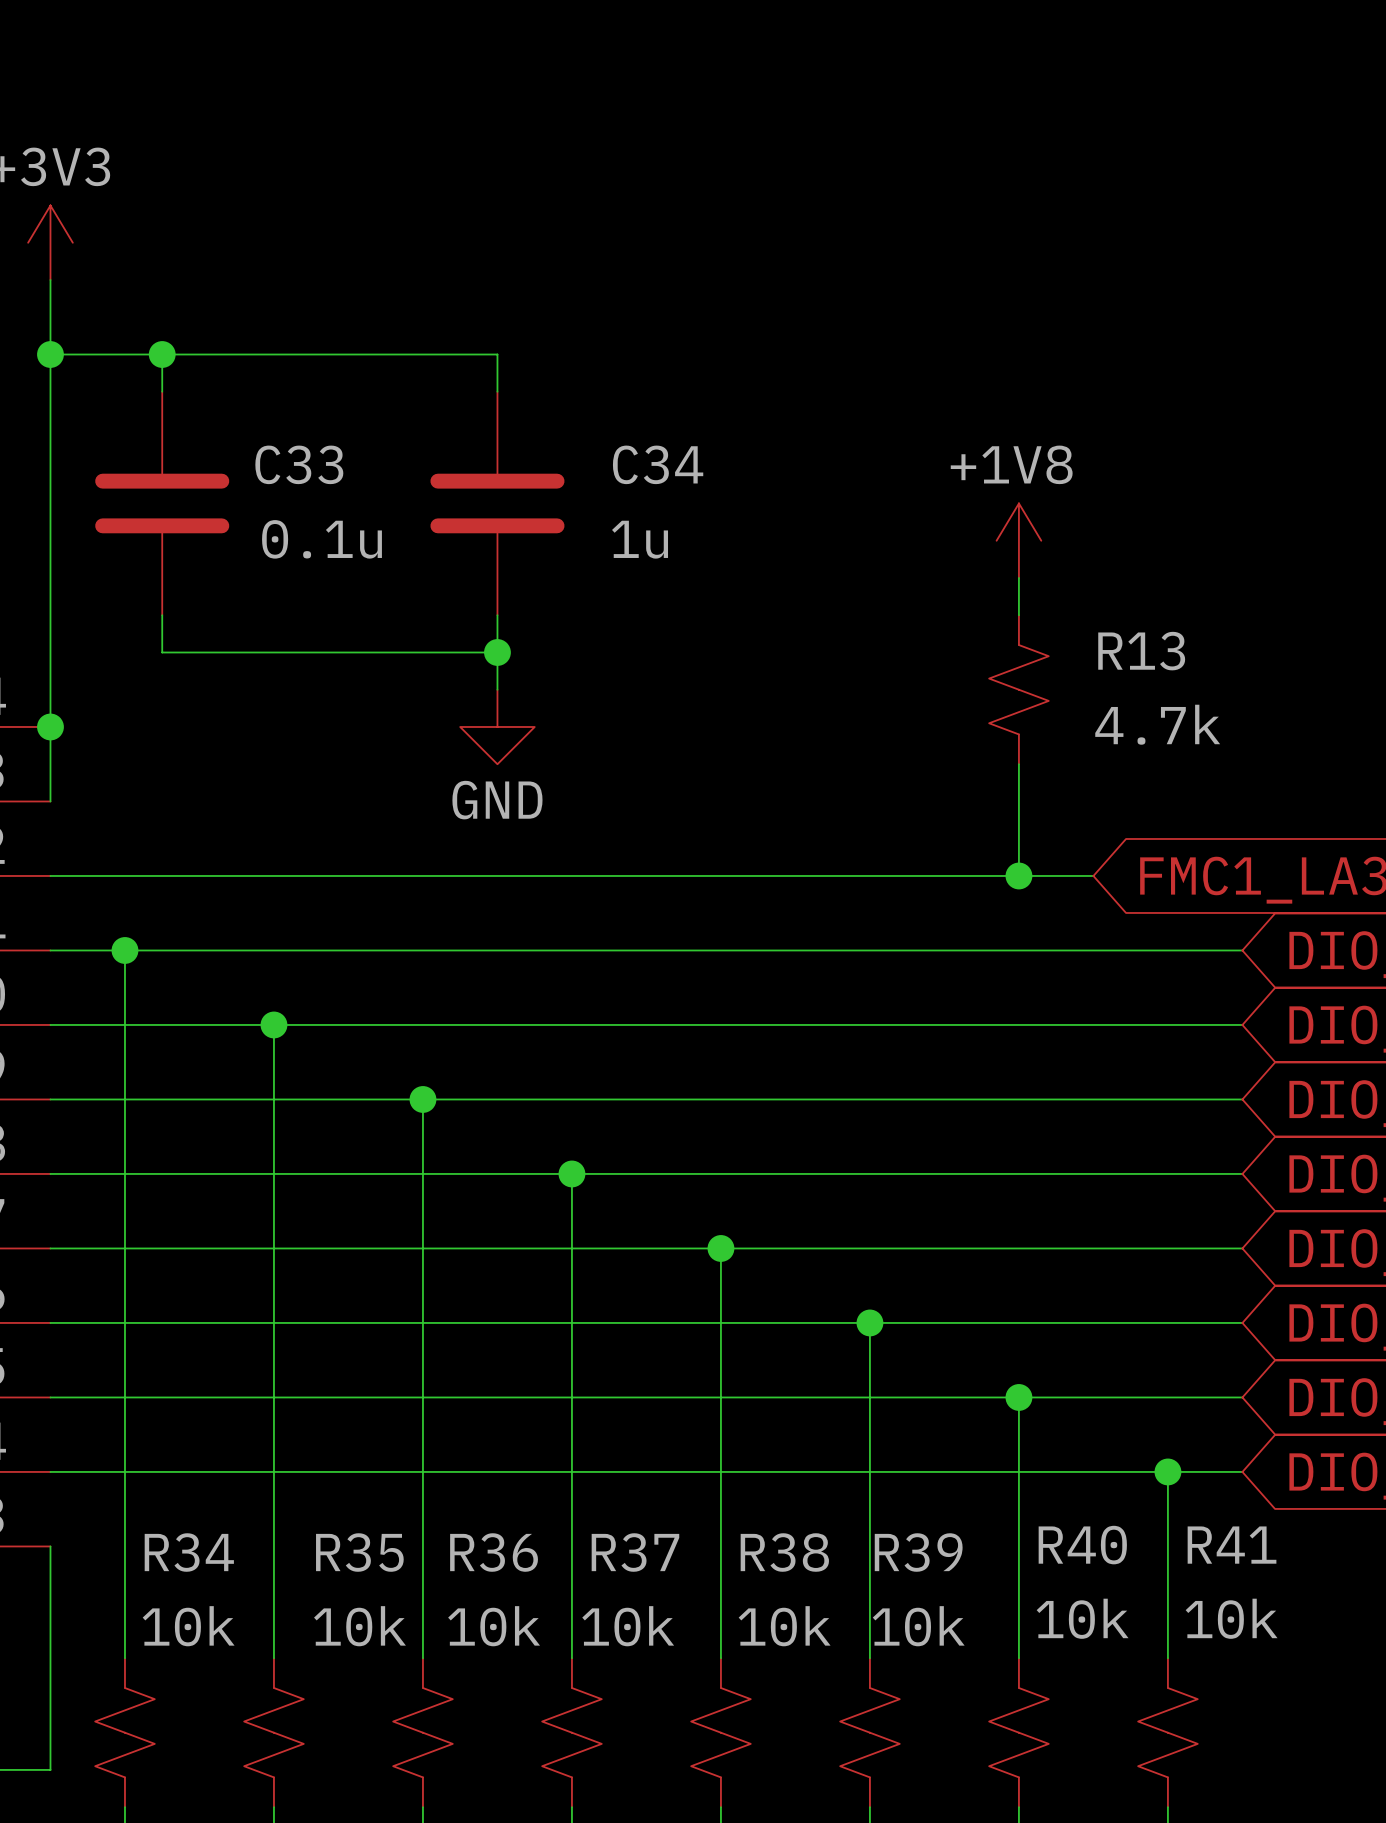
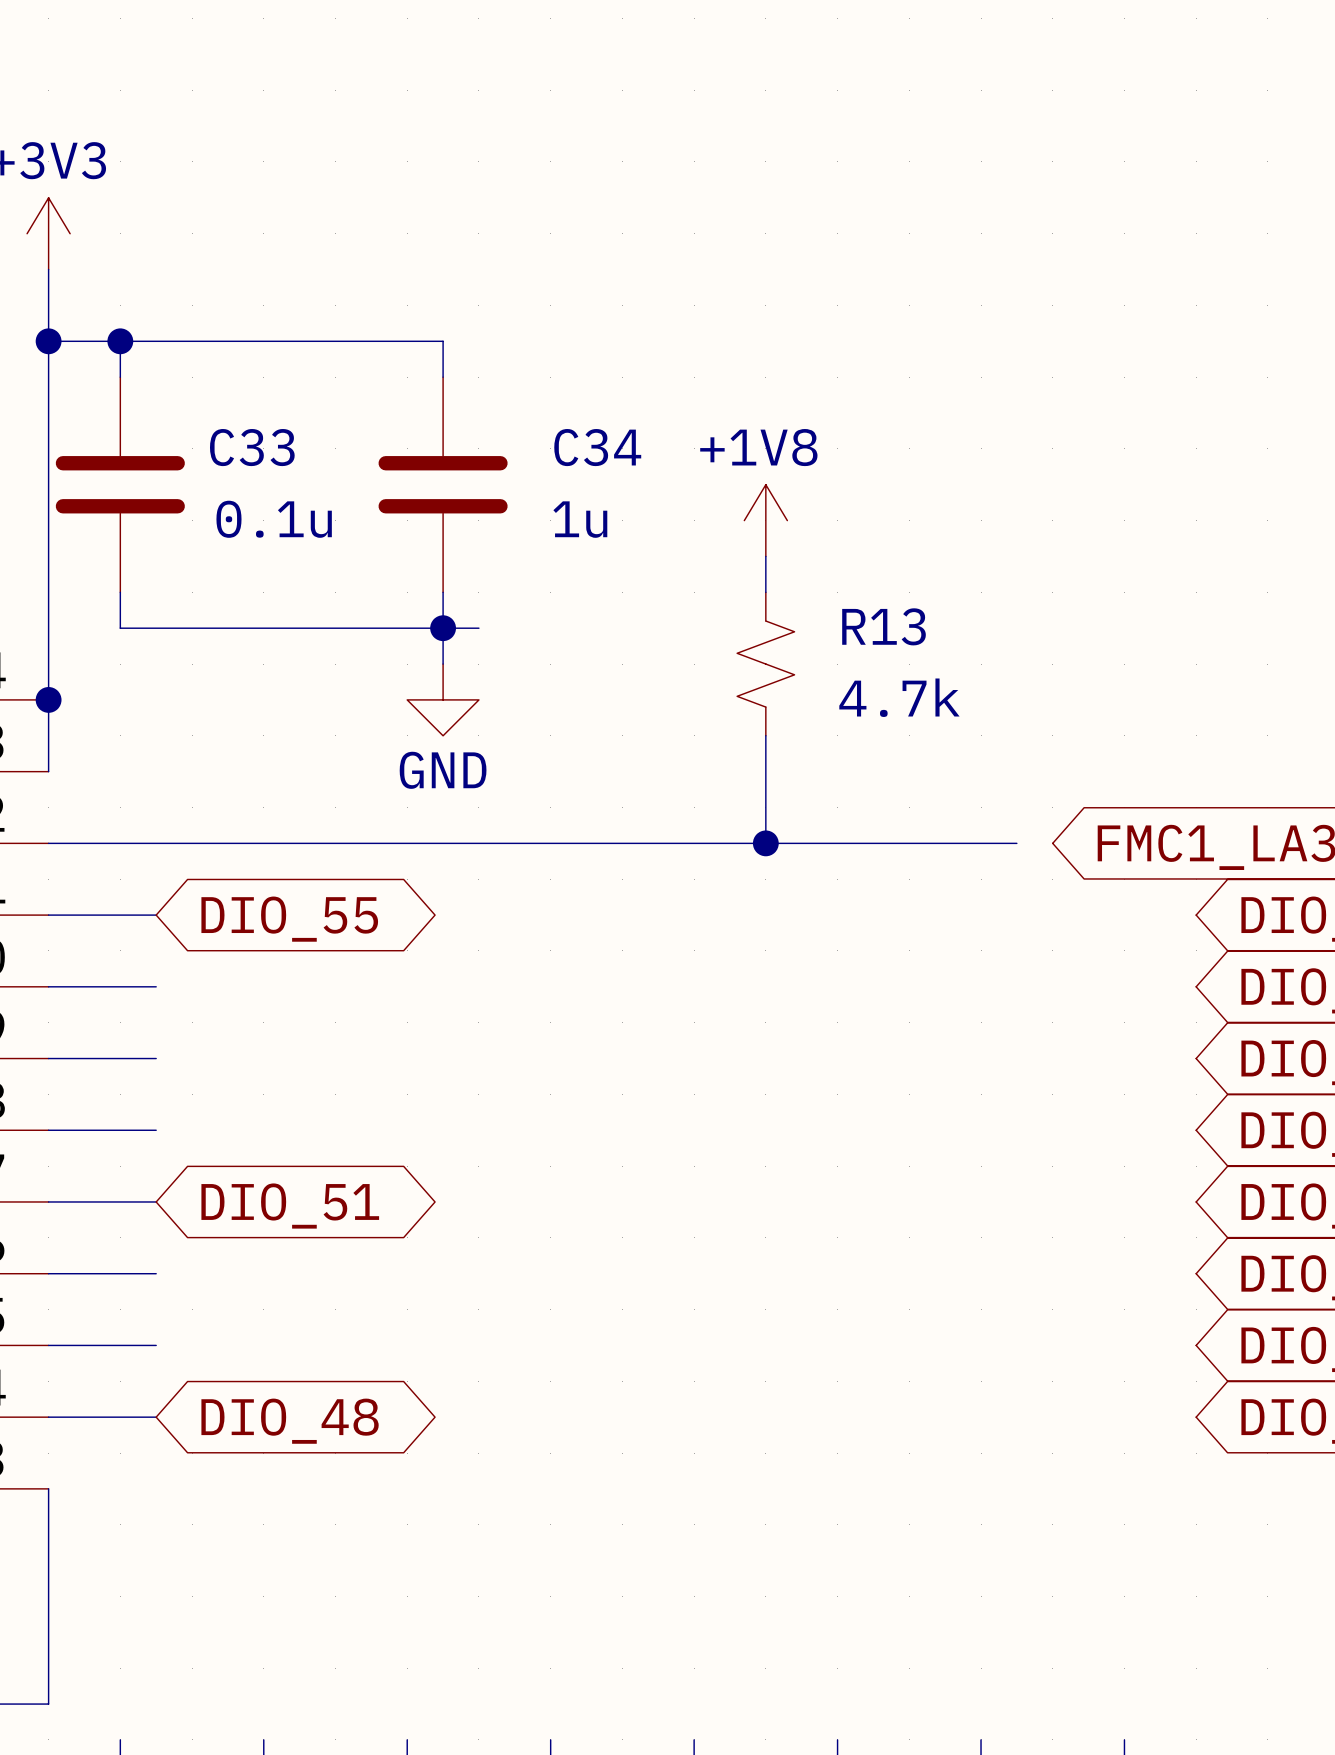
wire: (162, 354) (162, 391) -> (120, 341) (120, 377)
junction position: (162, 354) -> (120, 341)
wire: (460, 354) (497, 354) (497, 391) -> (443, 341) (443, 377)
C33 position: (162, 503) -> (120, 484)
C34 position: (497, 503) -> (443, 484)
power symbol position: +1V8 (1018, 540) -> +1V8 (765, 520)
wire: (1018, 577) (1018, 615) -> (765, 556) (765, 592)
wire: (162, 615) (162, 652) -> (120, 592) (120, 628) (156, 628)
wire: (497, 615) (497, 689) -> (443, 592) (443, 664)
junction position: (497, 652) -> (443, 628)
R13 position: (1018, 689) -> (765, 664)
power symbol position: GND (497, 726) -> GND (443, 699)
wire: (1018, 764) (1018, 875) -> (765, 735) (765, 843)
junction: none -> (765, 843)
junction: (1018, 875) -> none
wire: (1056, 875) (1093, 875) -> none
wire: (124, 950) (124, 1658) -> none
junction: (124, 950) -> none
wire: (162, 950) (1242, 950) -> none
global label: none -> DIO_55 (289, 919)
wire: (162, 1024) (1242, 1024) -> none
wire: (273, 1024) (273, 1658) -> none
junction: (273, 1024) -> none
wire: (162, 1099) (1242, 1099) -> none
wire: (422, 1099) (422, 1658) -> none
junction: (422, 1099) -> none
wire: (162, 1173) (1242, 1173) -> none
wire: (571, 1173) (571, 1658) -> none
junction: (571, 1173) -> none
wire: (162, 1248) (1242, 1248) -> none
wire: (720, 1248) (720, 1658) -> none
junction: (720, 1248) -> none
global label: none -> DIO_51 (290, 1206)
wire: (162, 1322) (1242, 1322) -> none
wire: (869, 1322) (869, 1658) -> none
junction: (869, 1322) -> none
wire: (162, 1397) (1242, 1397) -> none
wire: (1018, 1397) (1018, 1658) -> none
junction: (1018, 1397) -> none
wire: (162, 1471) (1242, 1471) -> none
wire: (1167, 1471) (1167, 1658) -> none
junction: (1167, 1471) -> none
global label: none -> DIO_48 (290, 1421)
R34: 10k (124, 1732) -> none
R35: 10k (273, 1732) -> none
R36: 10k (422, 1732) -> none
R37: 10k (571, 1732) -> none
R38: 10k (720, 1732) -> none
R39: 10k (869, 1732) -> none
R40: 10k (1018, 1732) -> none
R41: 10k (1167, 1732) -> none

